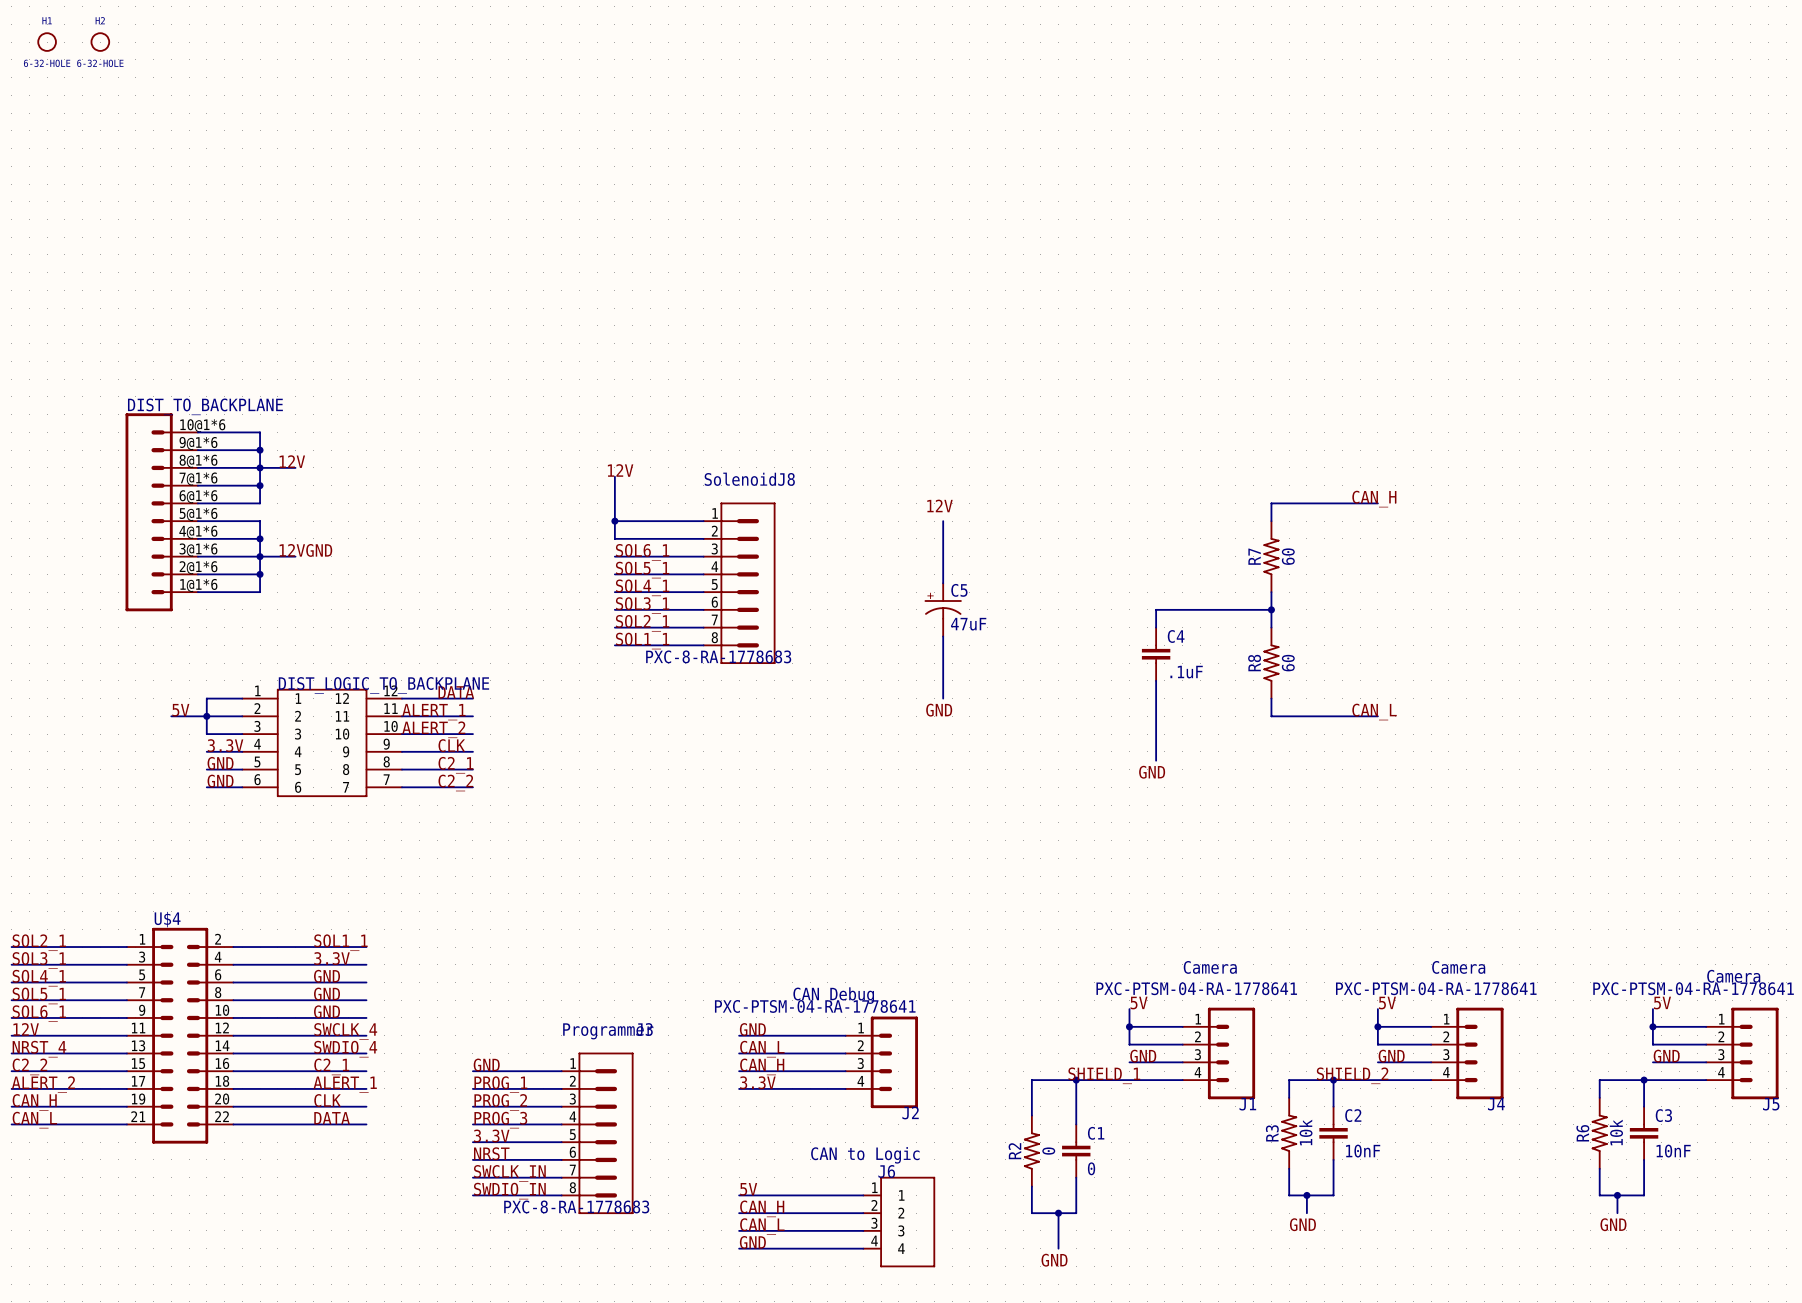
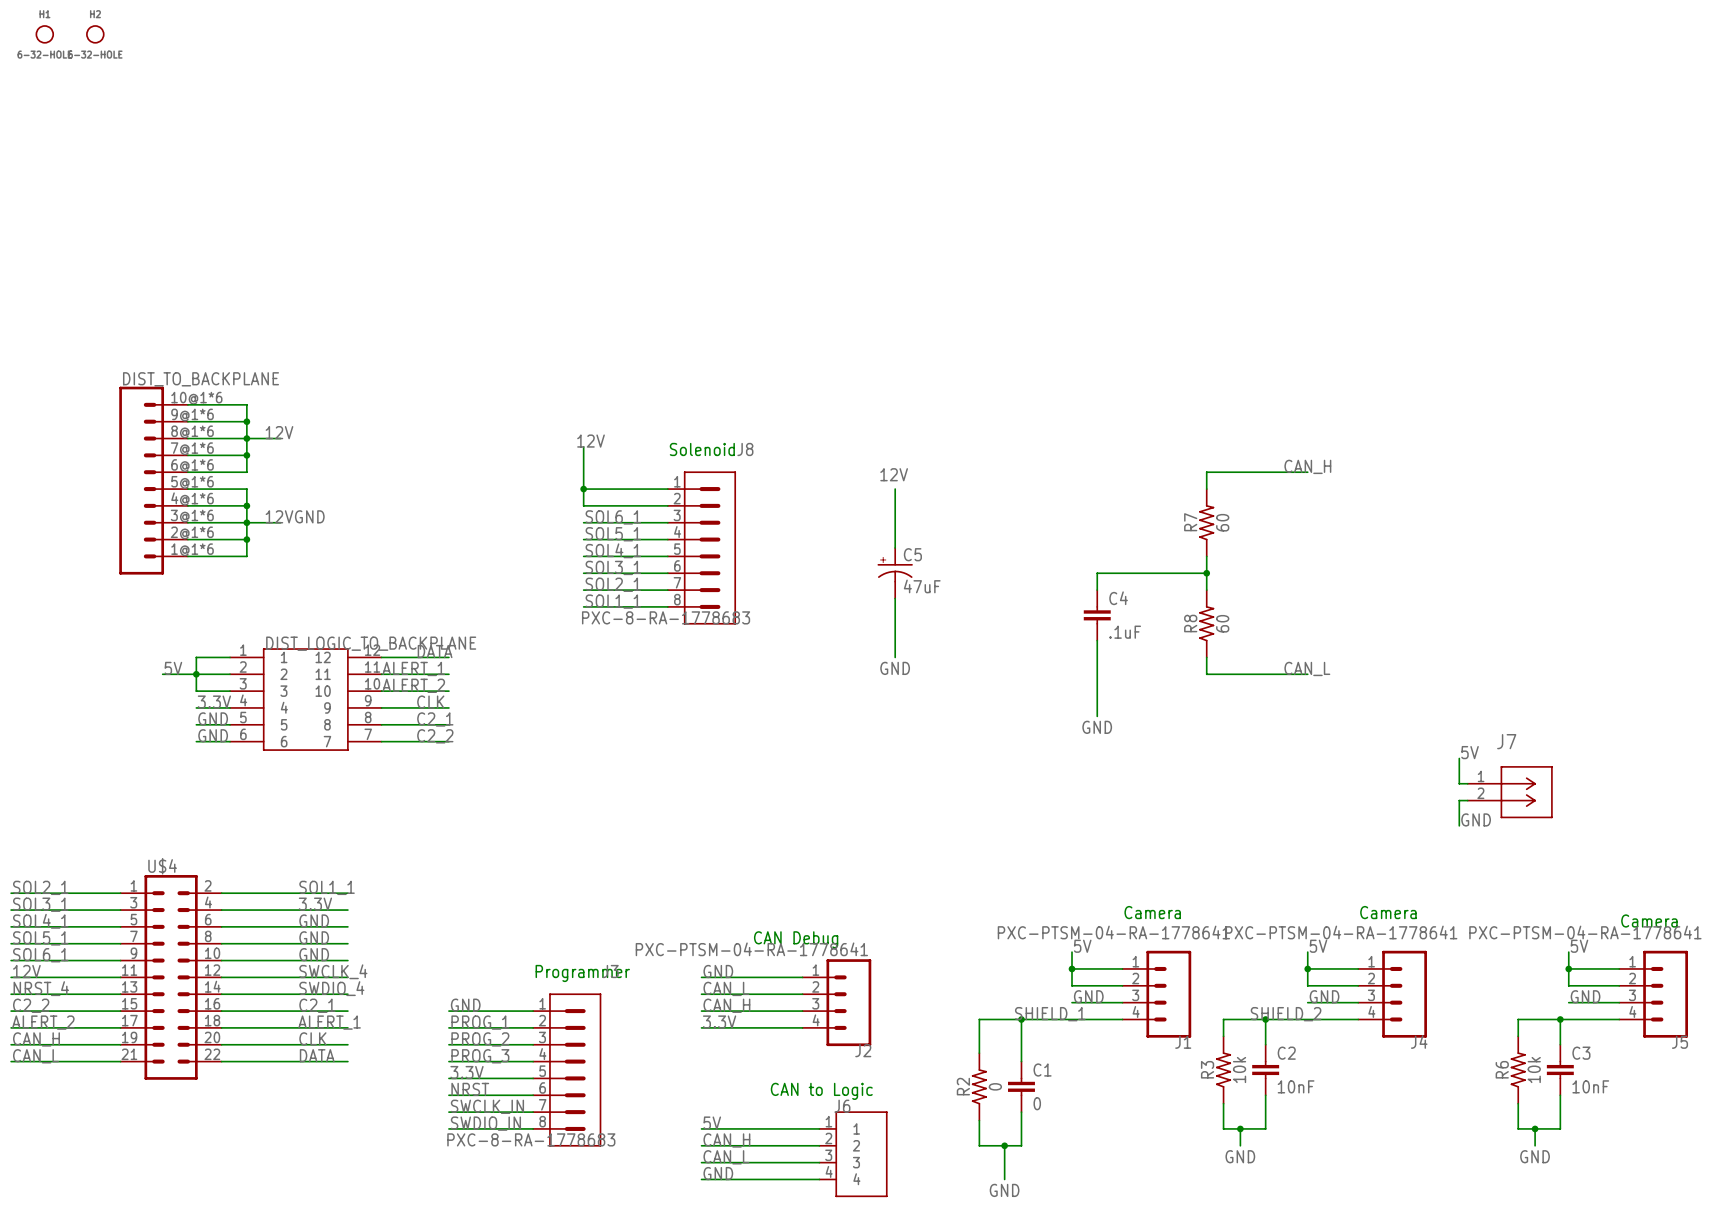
label: none -> 5V (1470, 752)
wire: none -> (1459, 758) (1459, 783) (1467, 783)
J7: none -> (1510, 792)
wire: none -> (1467, 800) (1459, 800) (1459, 825)
label: none -> GND (1476, 819)

